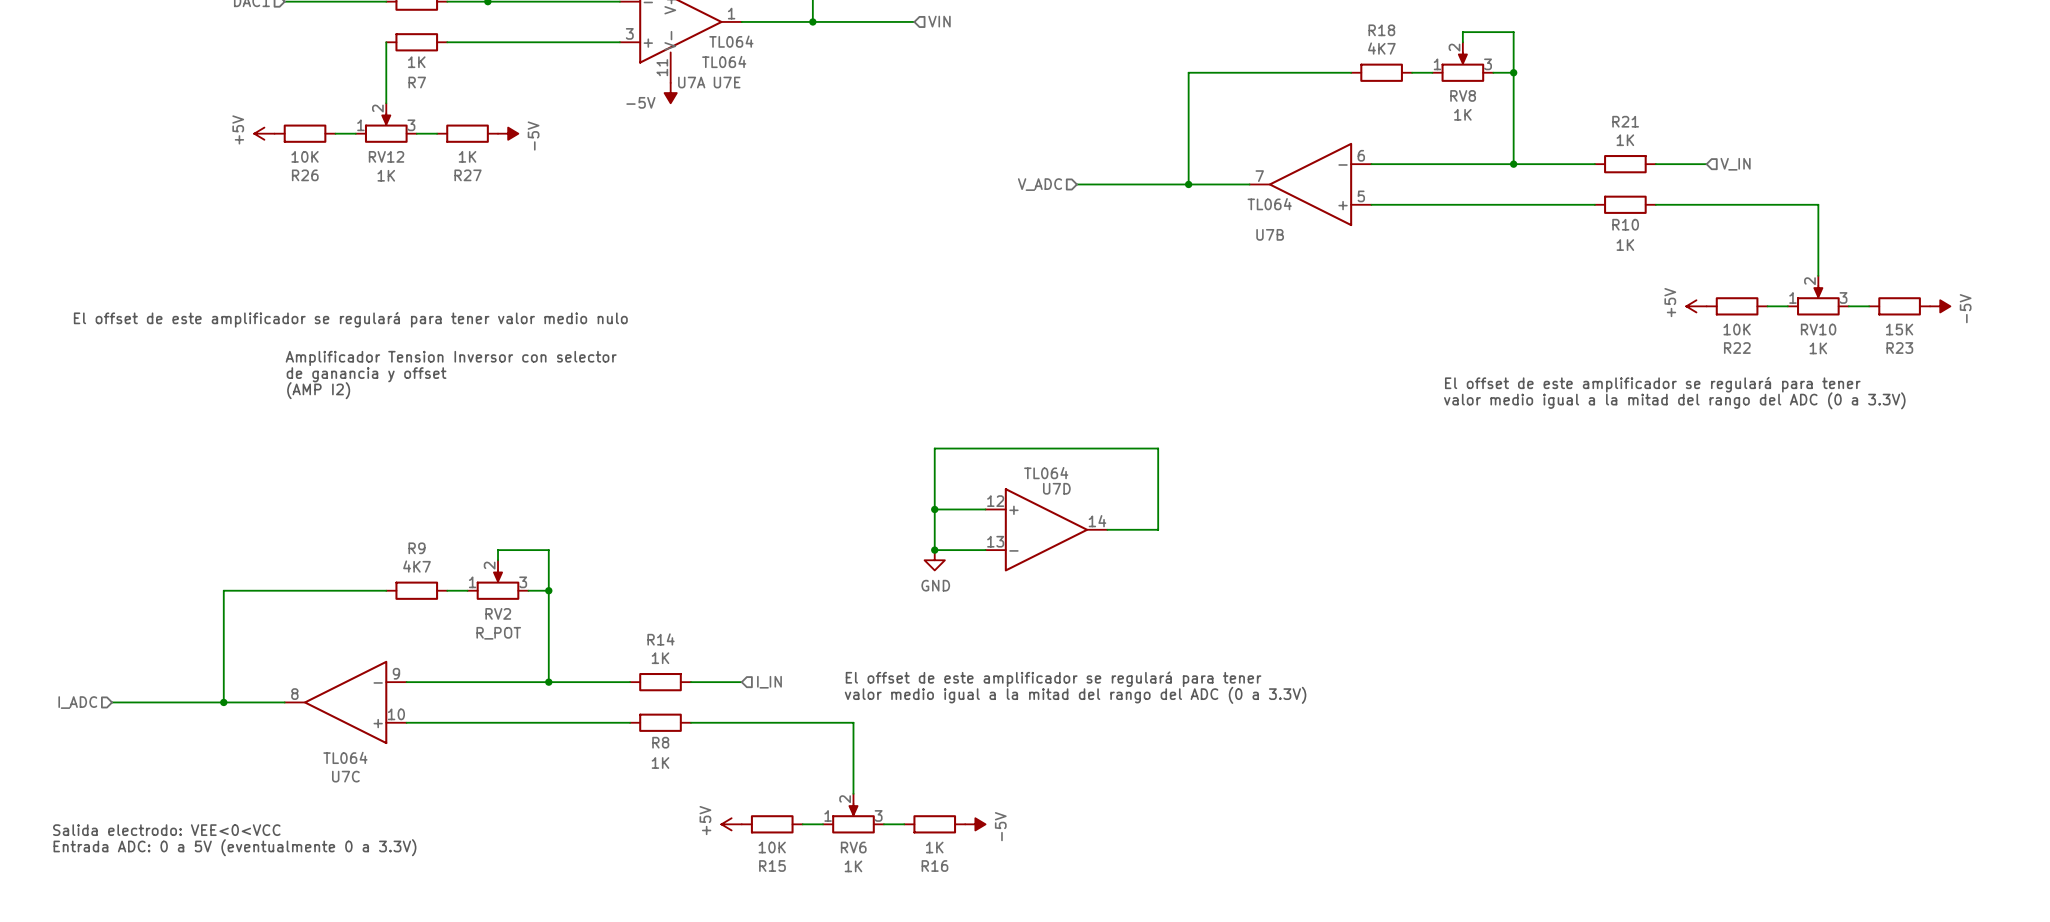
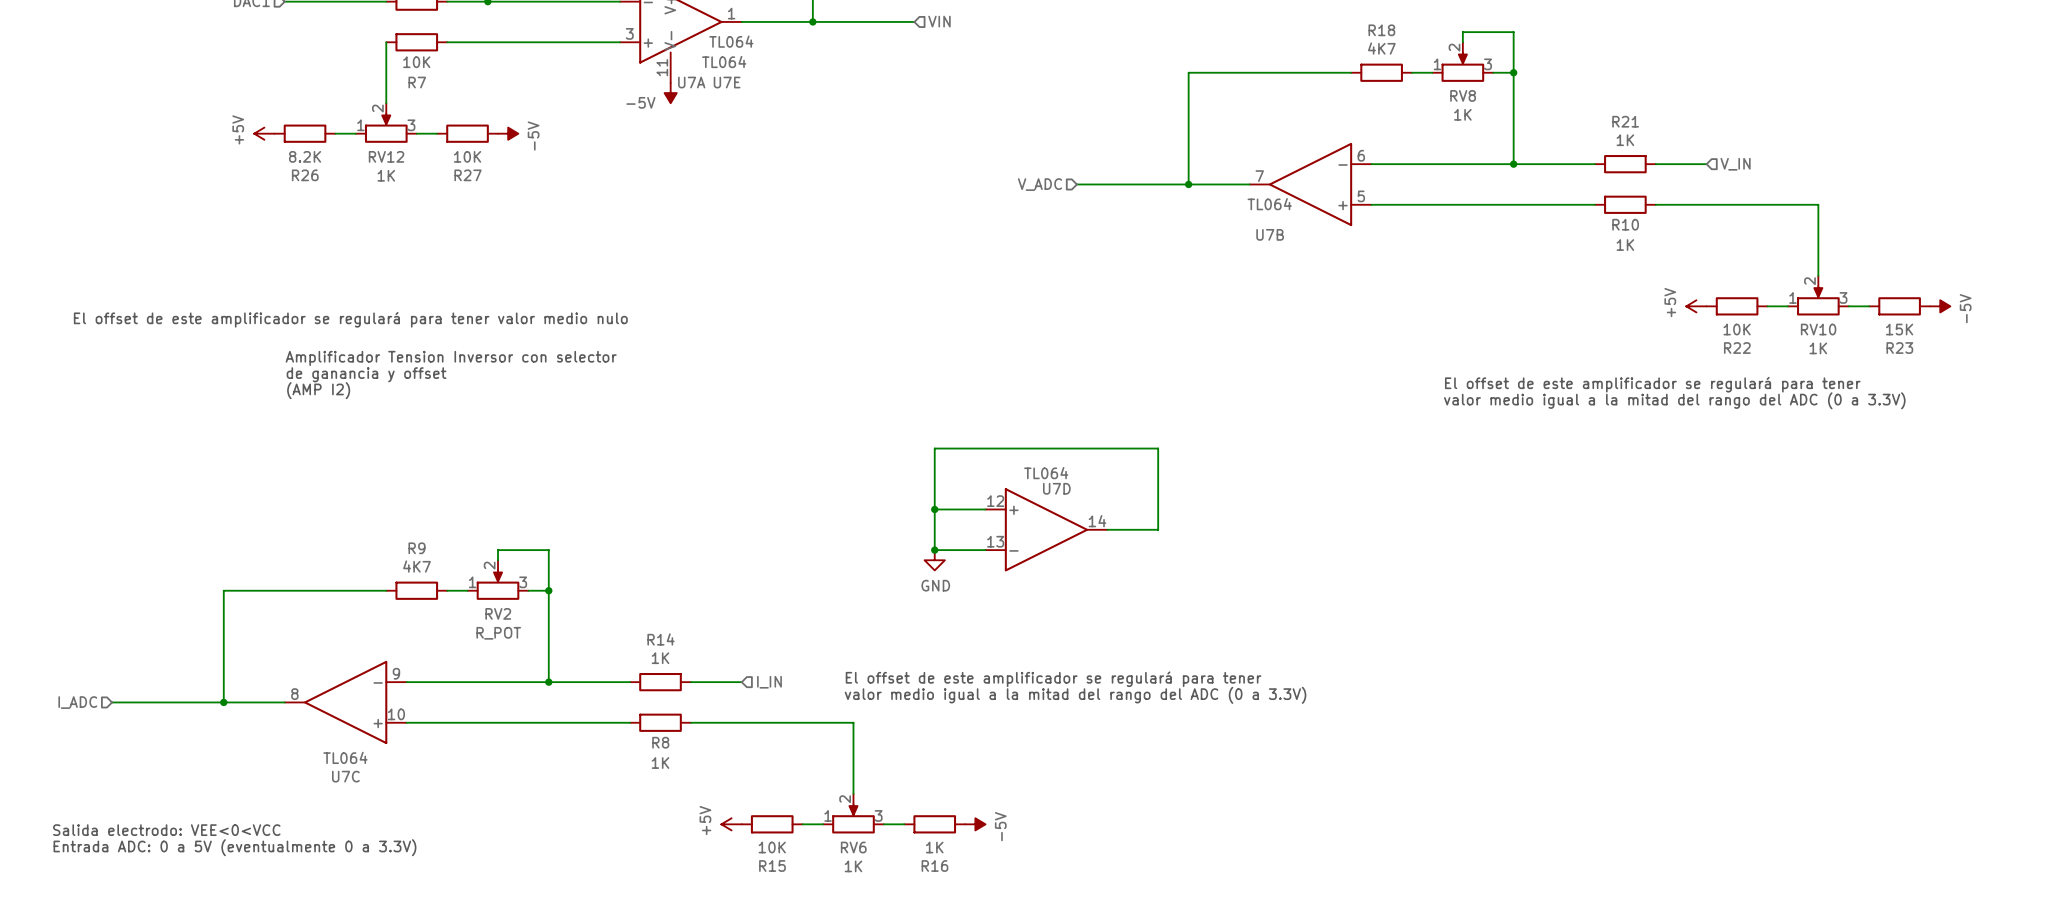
R7 value: 1K (416, 62) -> 10K (416, 62)
R26 value: 10K (305, 156) -> 8.2K (305, 156)
R27 value: 1K (467, 156) -> 10K (467, 156)

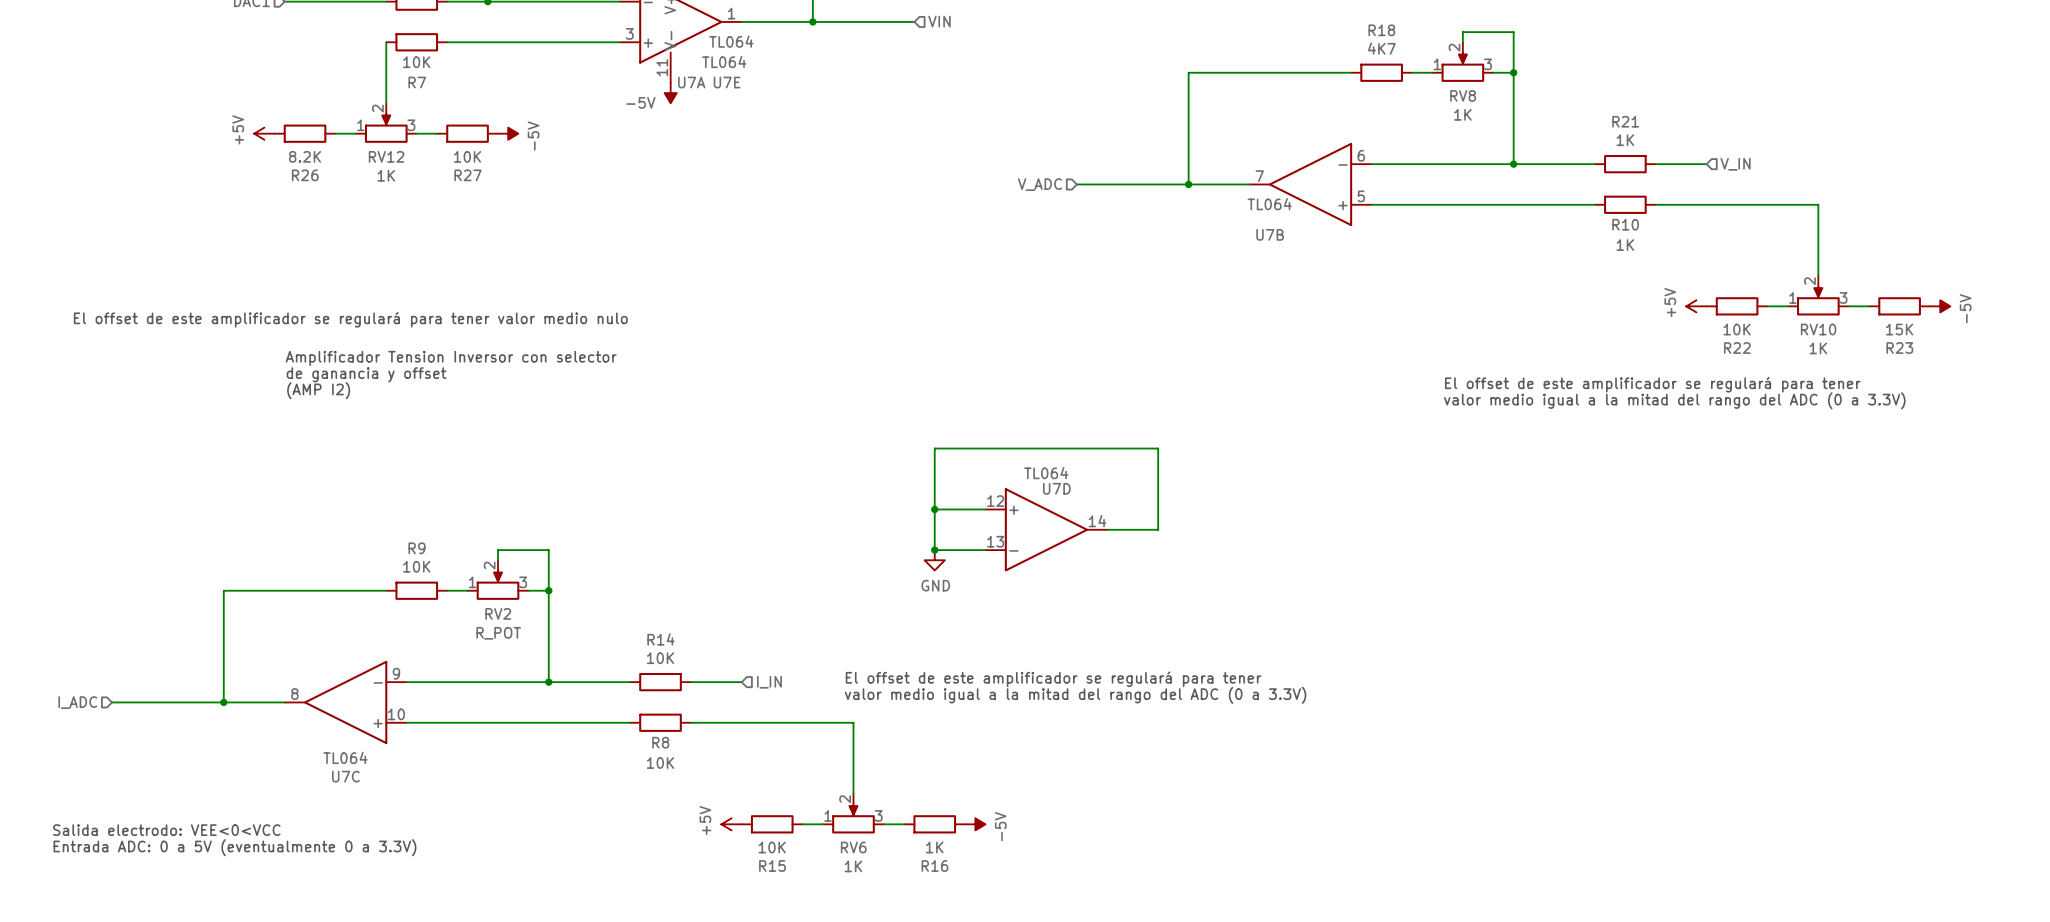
R9 value: 4K7 (417, 566) -> 10K (416, 566)
R14 value: 1K (660, 658) -> 10K (660, 658)
R8 value: 1K (660, 763) -> 10K (660, 763)

